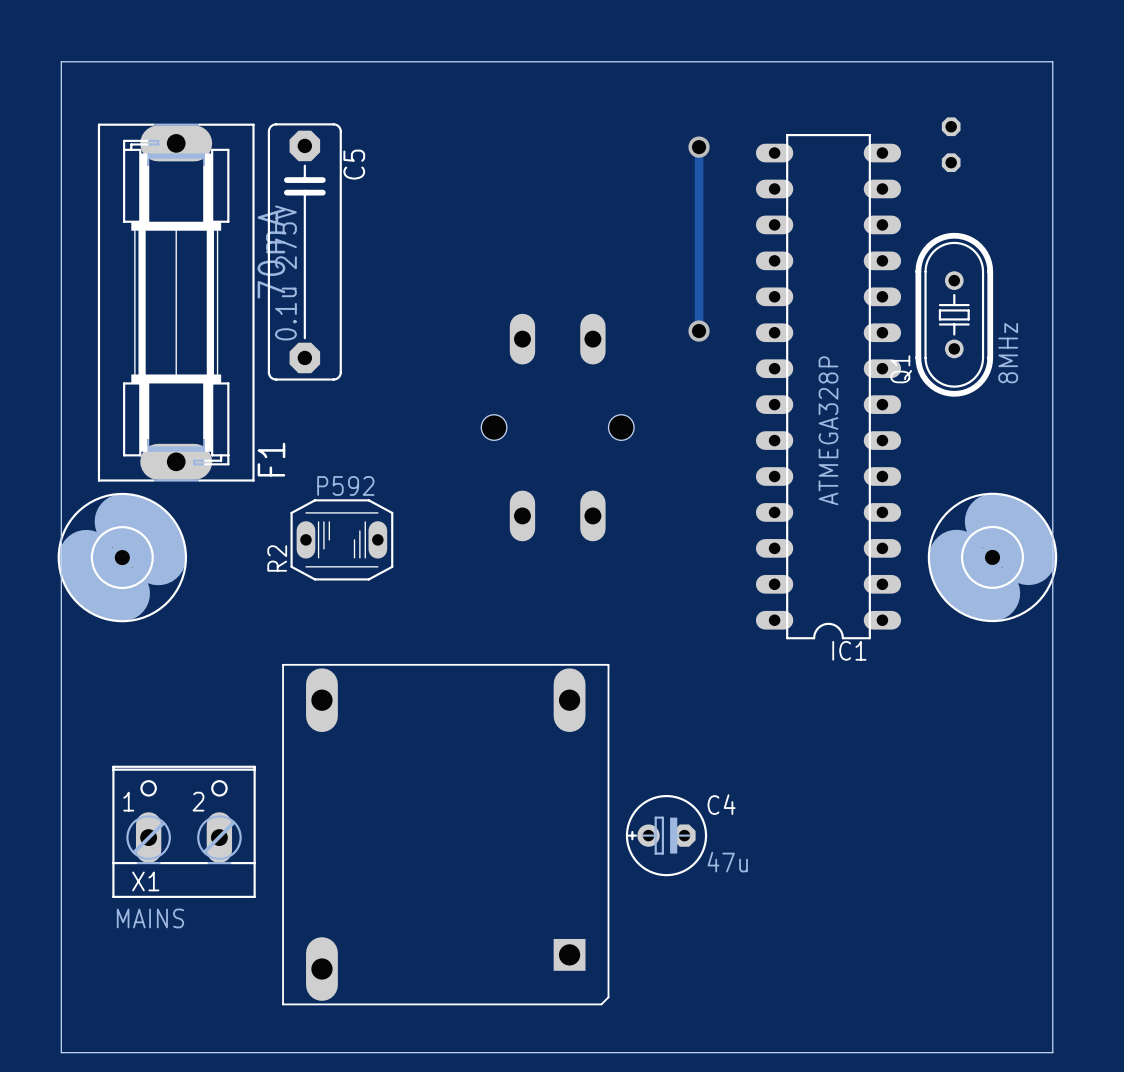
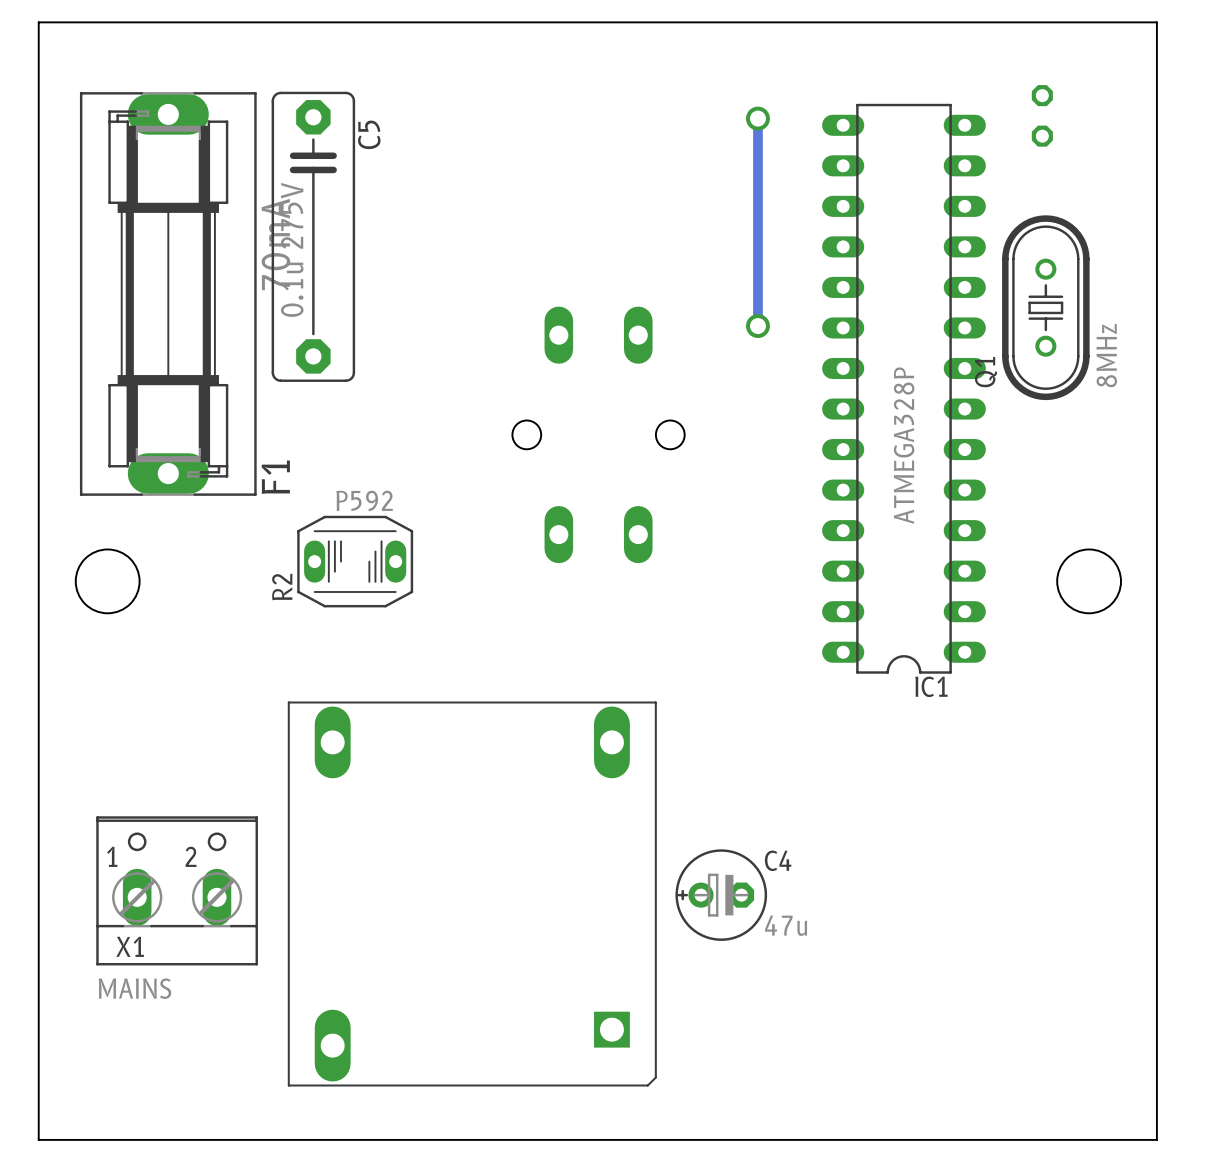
part: (122, 557) -> none
part: (992, 557) -> none

